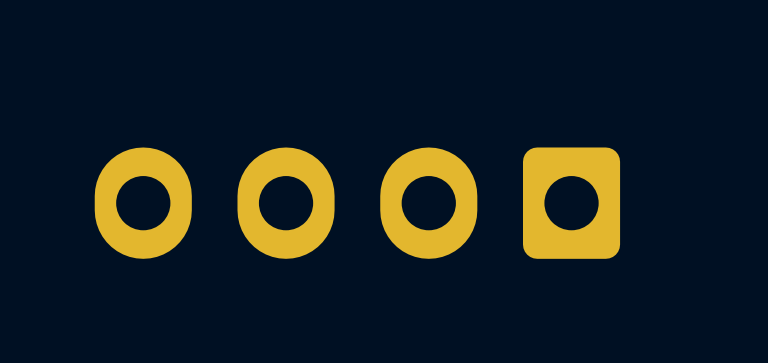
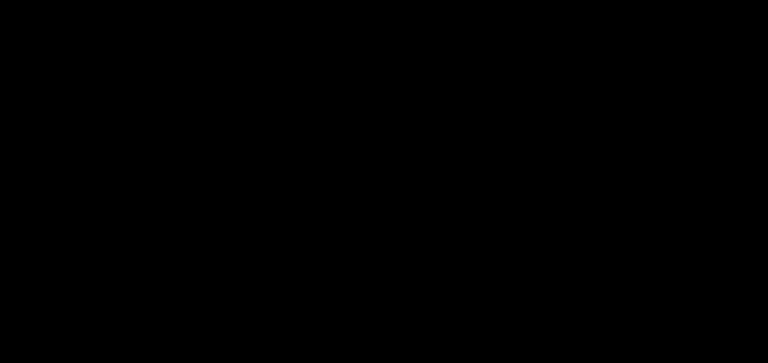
part: (357, 203) -> none

